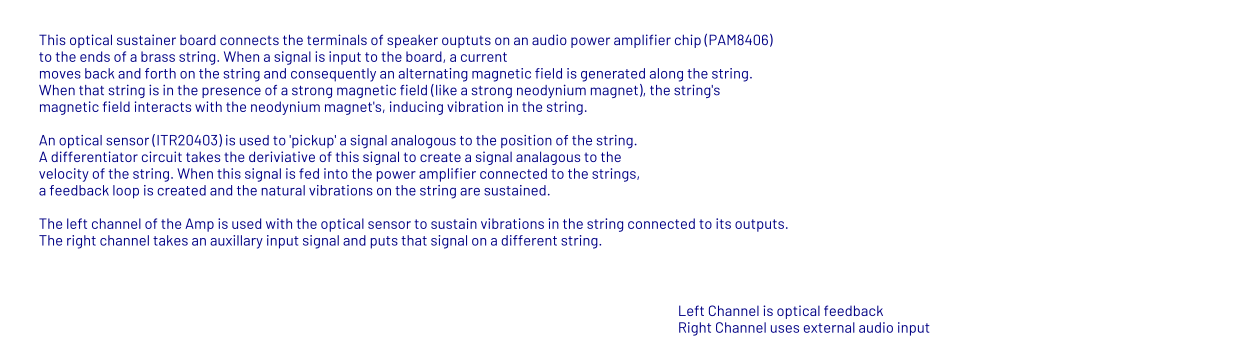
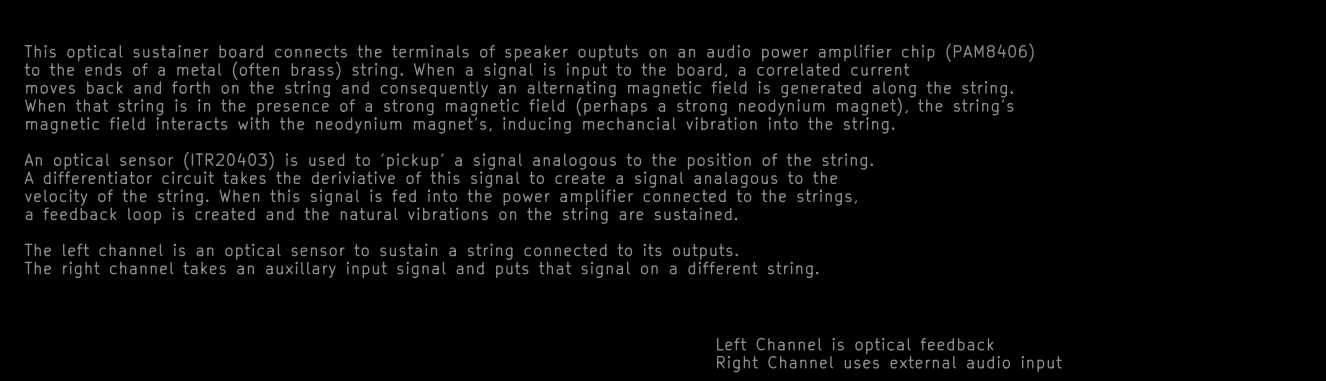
text: to the ends of a brass string. When a signal is input to the board, a current (273, 58) -> to the ends of a metal (often brass) string. When a signal is input to the board, a correlated current (466, 70)
text: When that string is in the presence of a strong magnetic field (like a strong neodynium magnet), the string's (379, 91) -> When that string is in the presence of a strong magnetic field (perhaps a strong neodynium magnet), the string's (519, 106)
text: magnetic field interacts with the neodynium magnet's, inducing vibration in the string. (313, 108) -> magnetic field interacts with the neodynium magnet's, inducing mechancial vibration into the string. (460, 125)
text: The left channel of the Amp is used with the optical sensor to sustain vibrations in the string connected to its outputs. (413, 225) -> The left channel is an optical sensor to sustain a string connected to its outputs. (381, 251)

